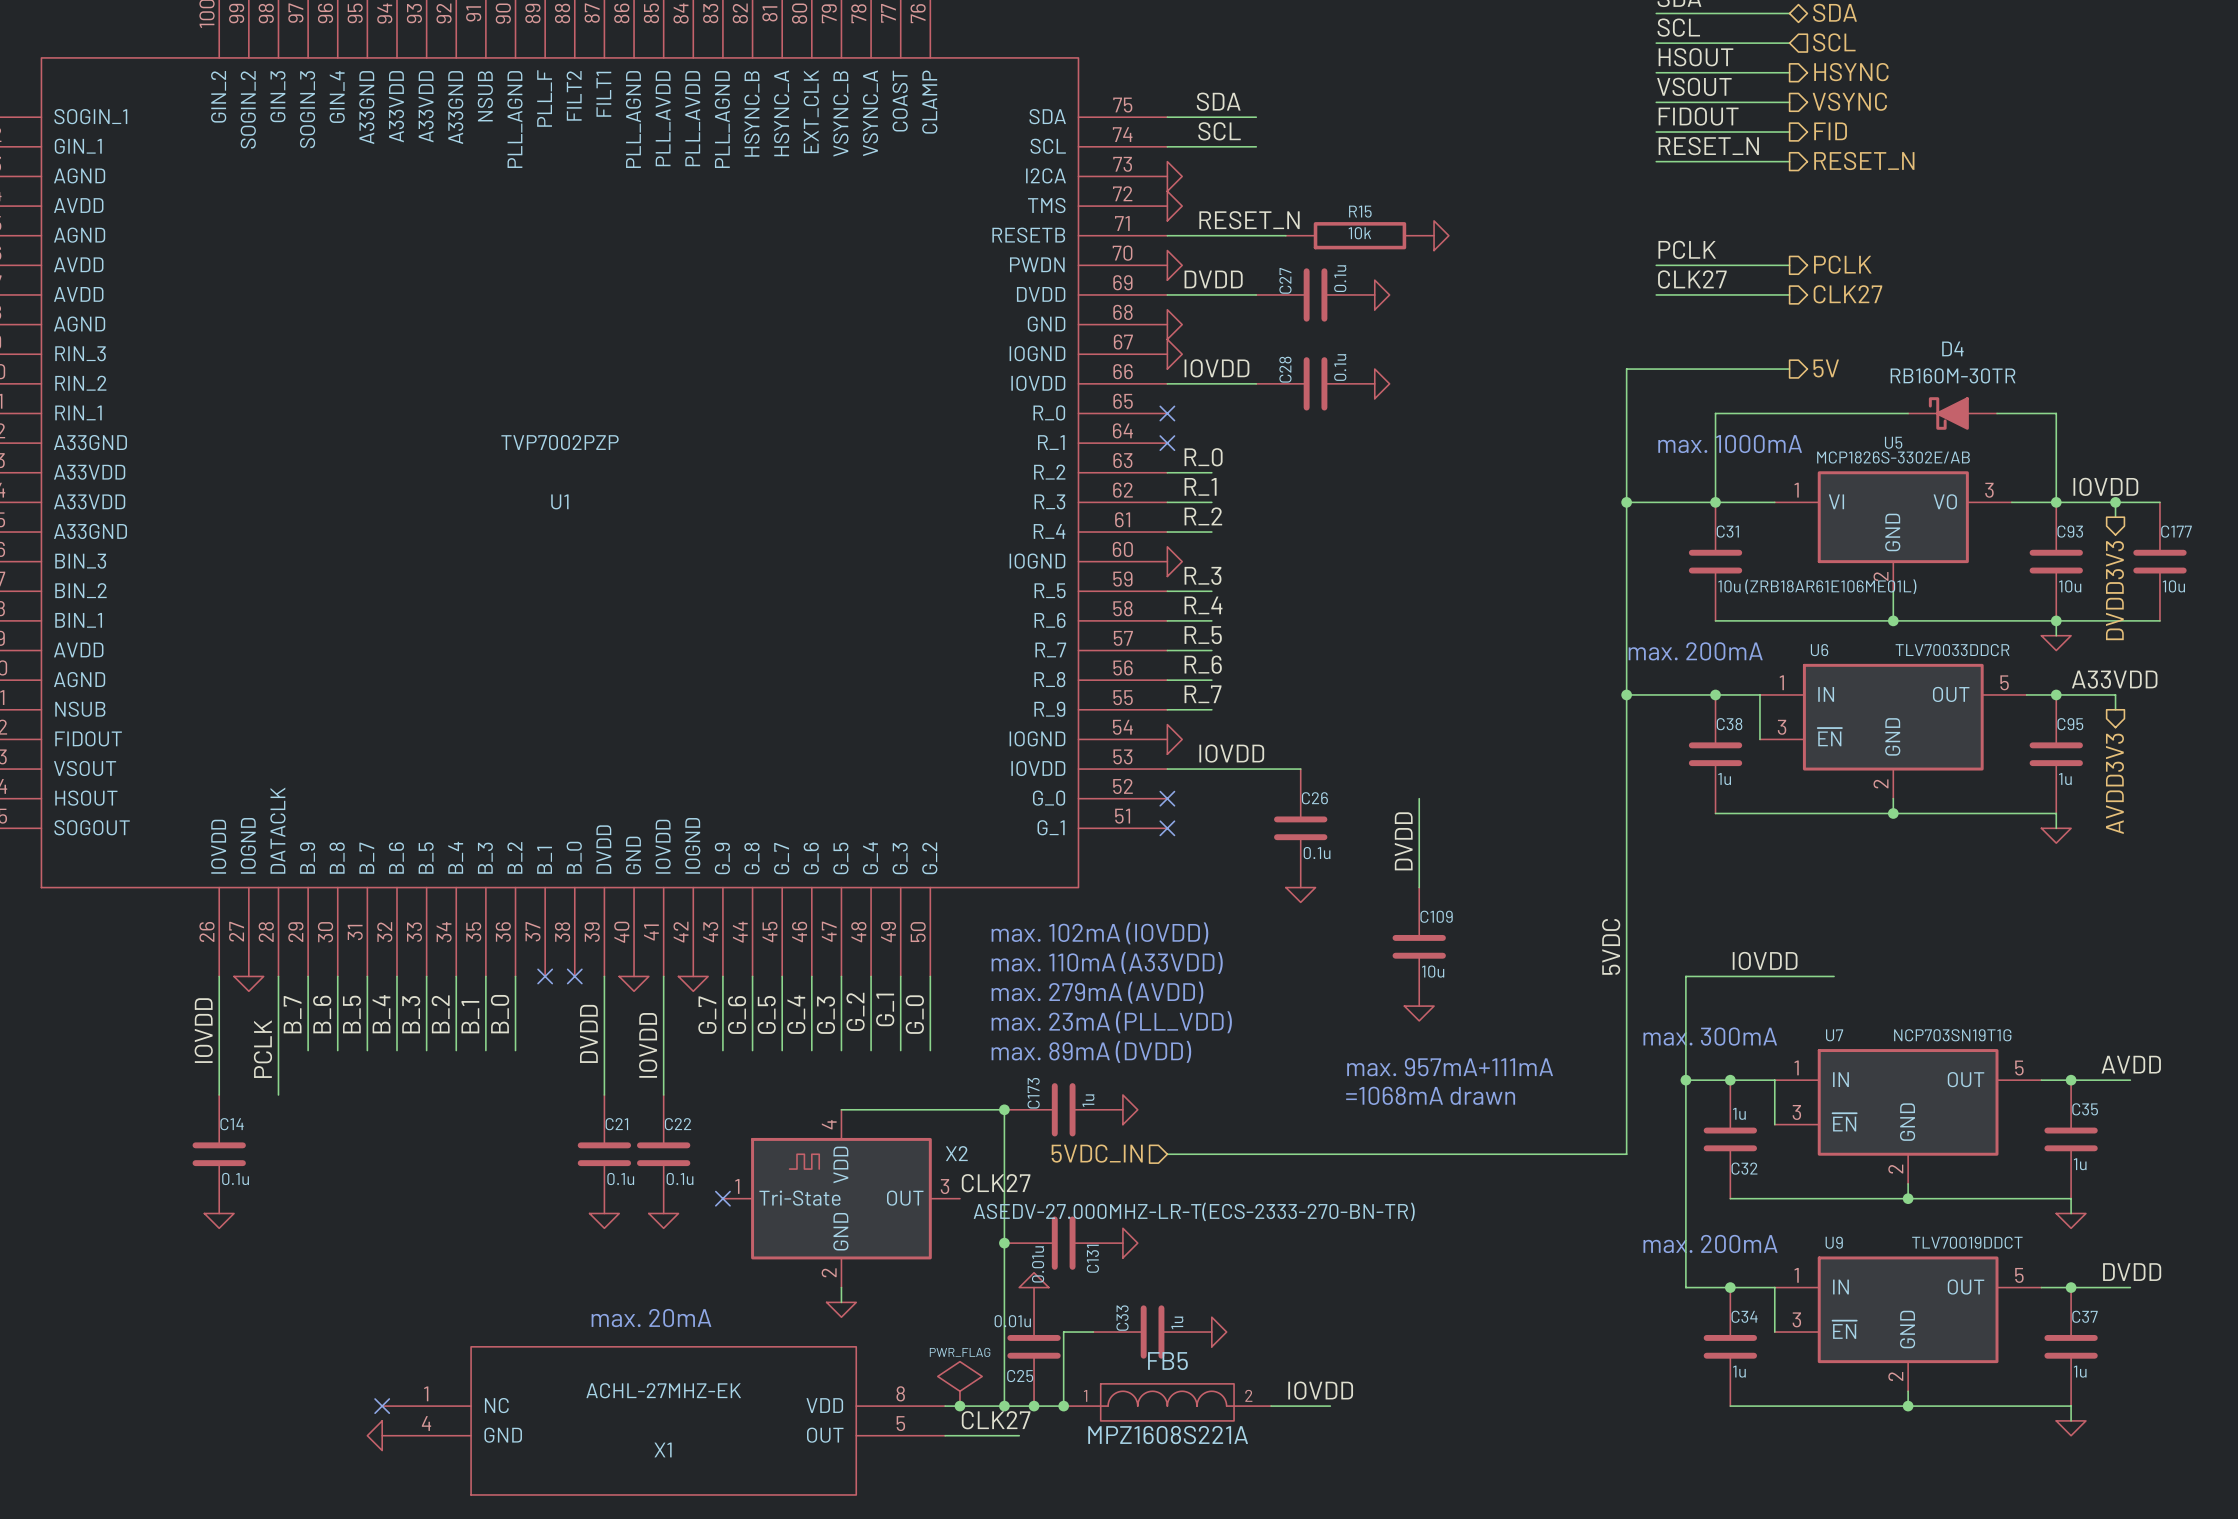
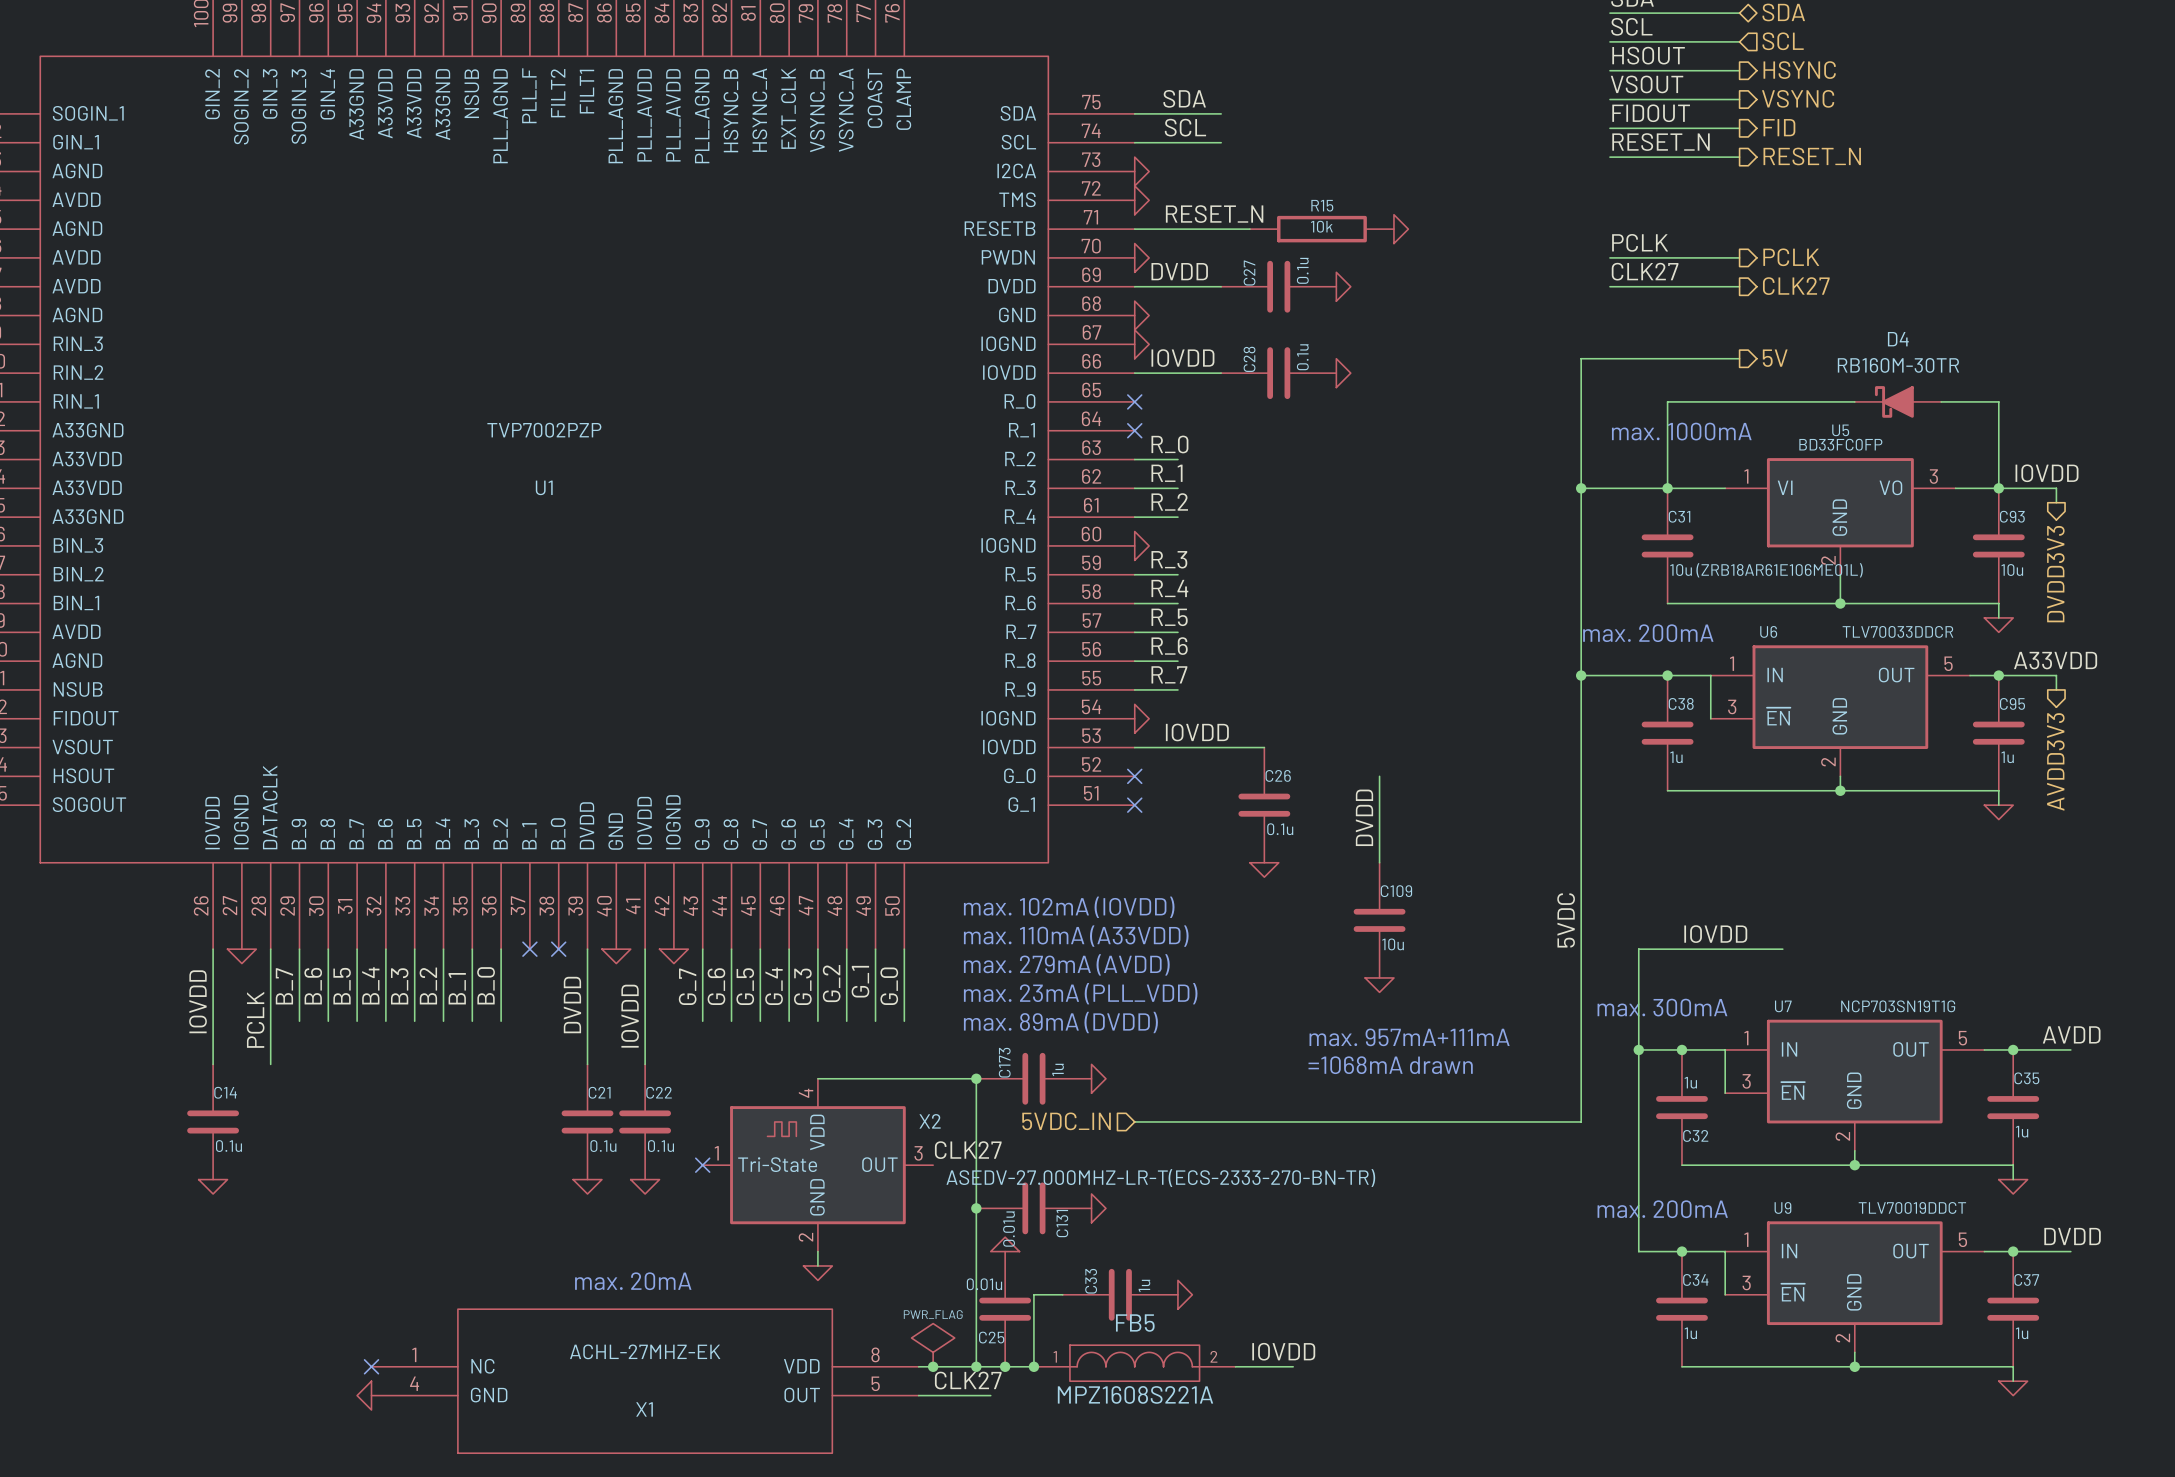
U5 value: MCP1826S-3302E/AB (1893, 457) -> BD33FC0FP (1840, 444)
wire: (2115, 502) (2159, 502) -> none
junction: (2115, 502) -> none
C177: 10u (2159, 561) -> none
wire: (2056, 620) (2159, 620) -> none
junction: (2056, 620) -> none

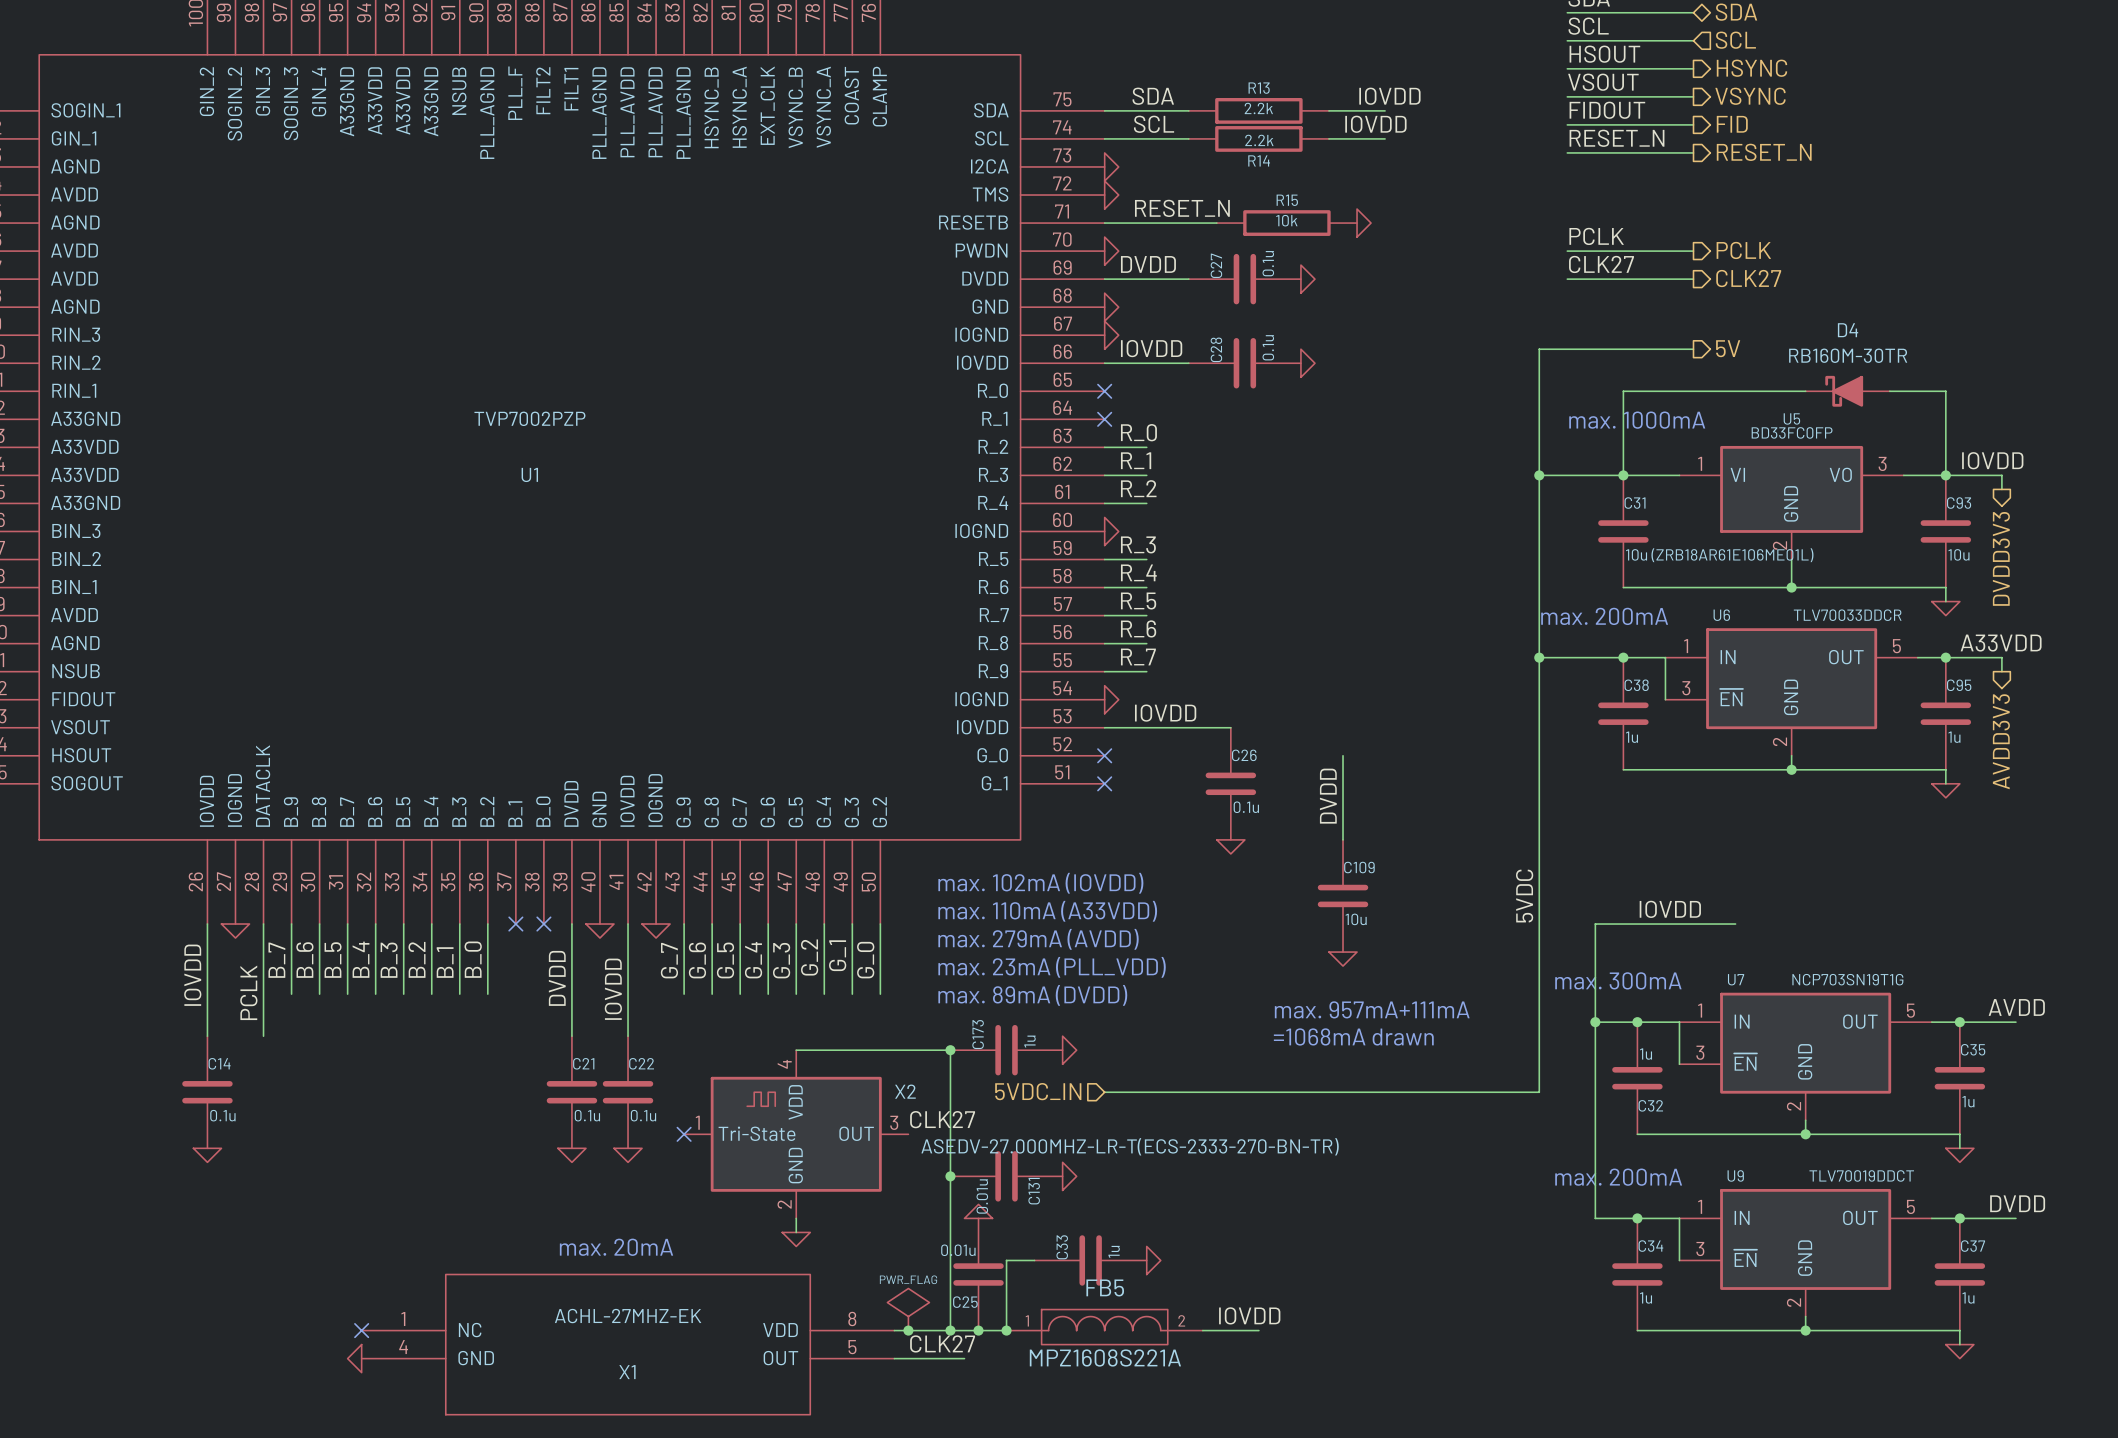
label: none -> IOVDD (1389, 96)
R13: none -> 2.2k (1258, 110)
wire: none -> (1328, 110) (1385, 110)
label: none -> IOVDD (1375, 124)
R14: none -> 2.2k (1258, 138)
wire: none -> (1328, 138) (1385, 138)

